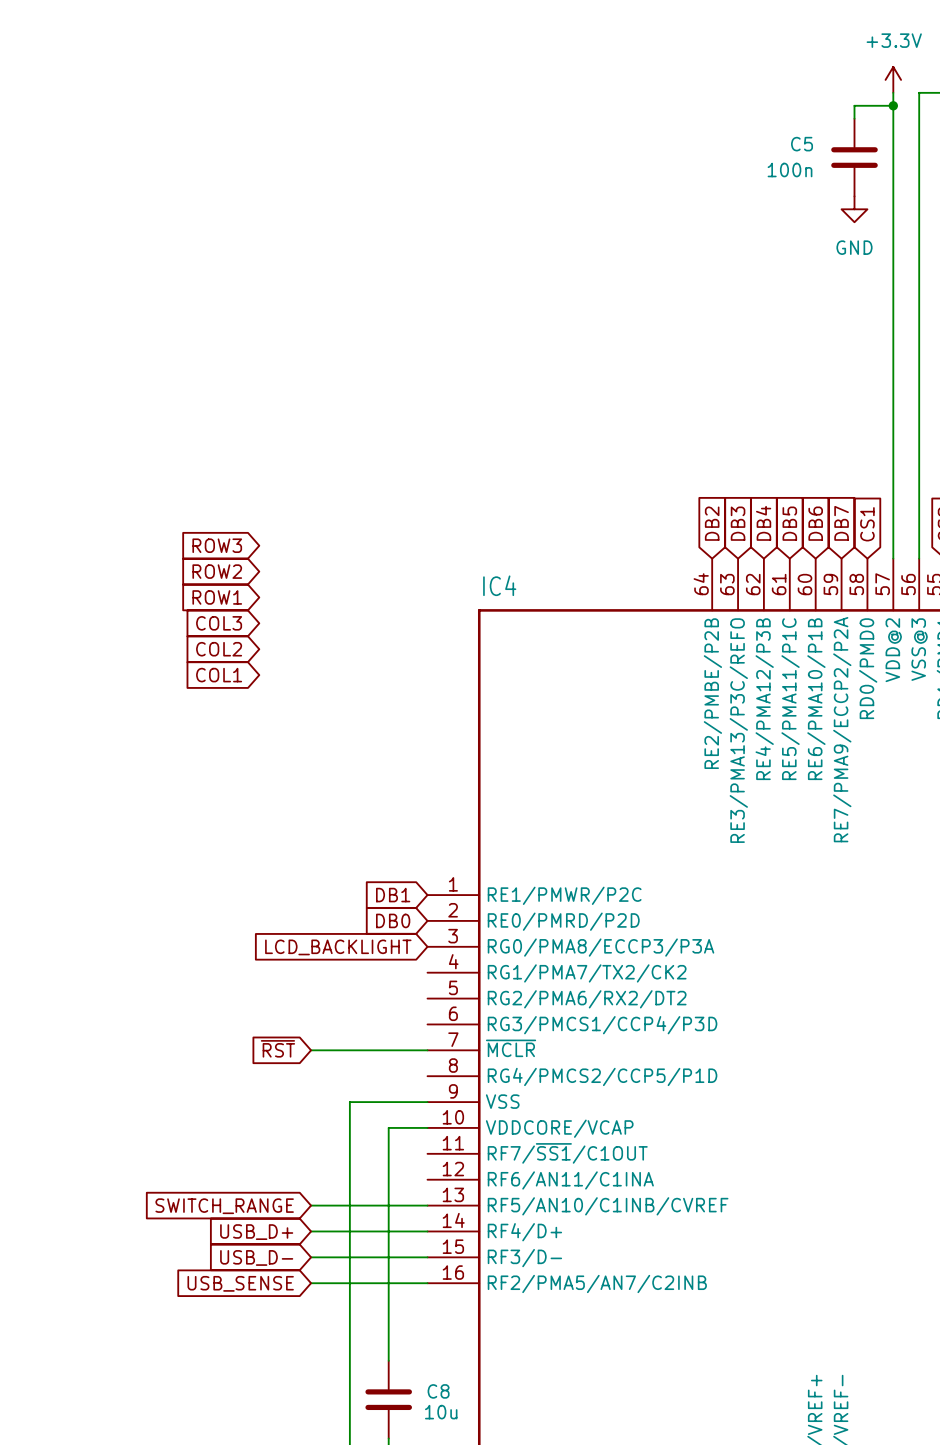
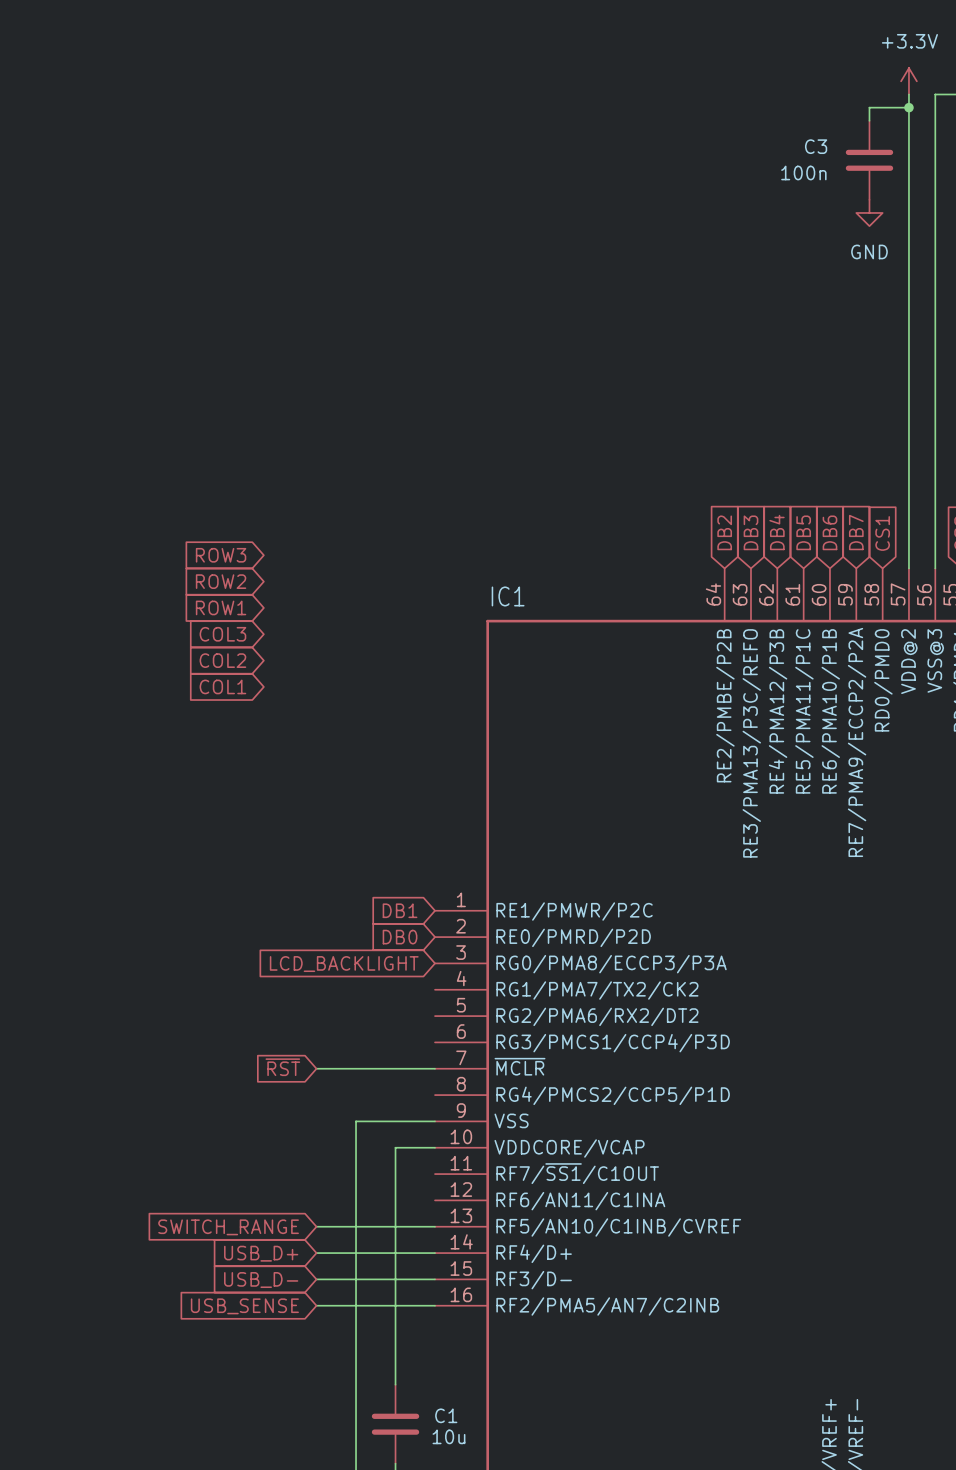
C5 name: C5 (802, 144) -> C3 (816, 146)
IC4 name: IC4 (499, 585) -> IC1 (508, 596)
C8 name: C8 (438, 1391) -> C1 (446, 1415)

